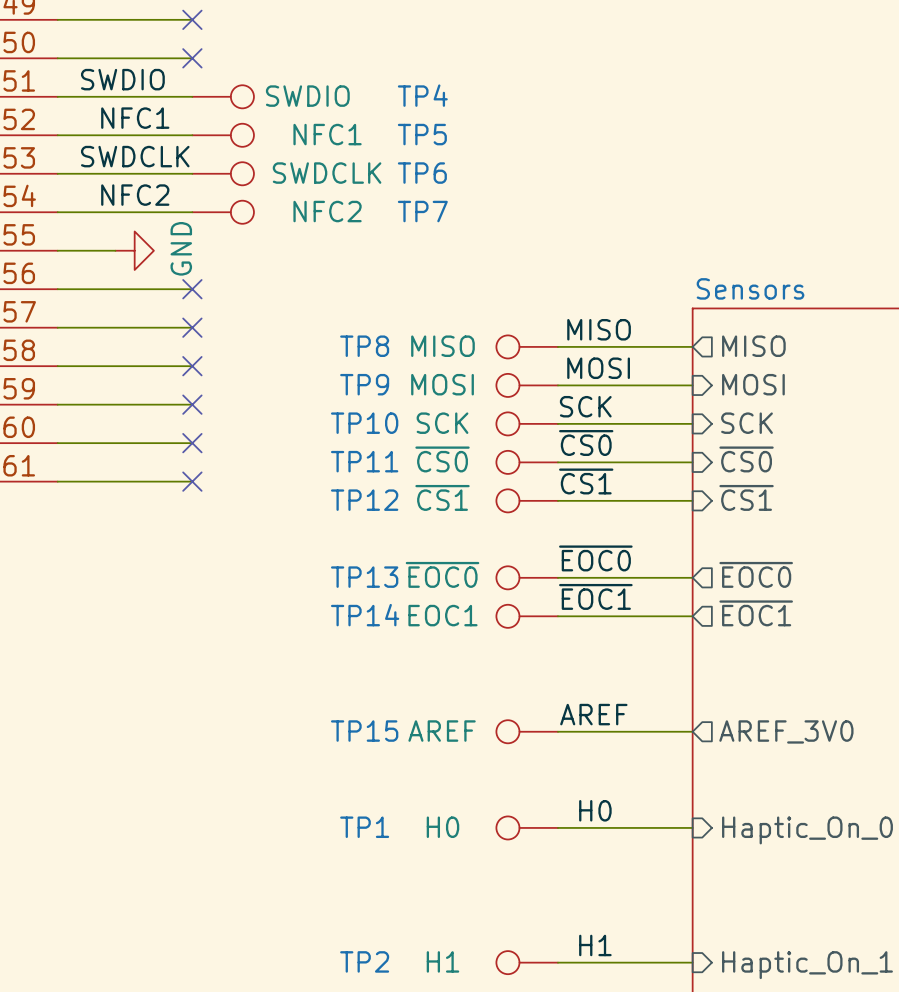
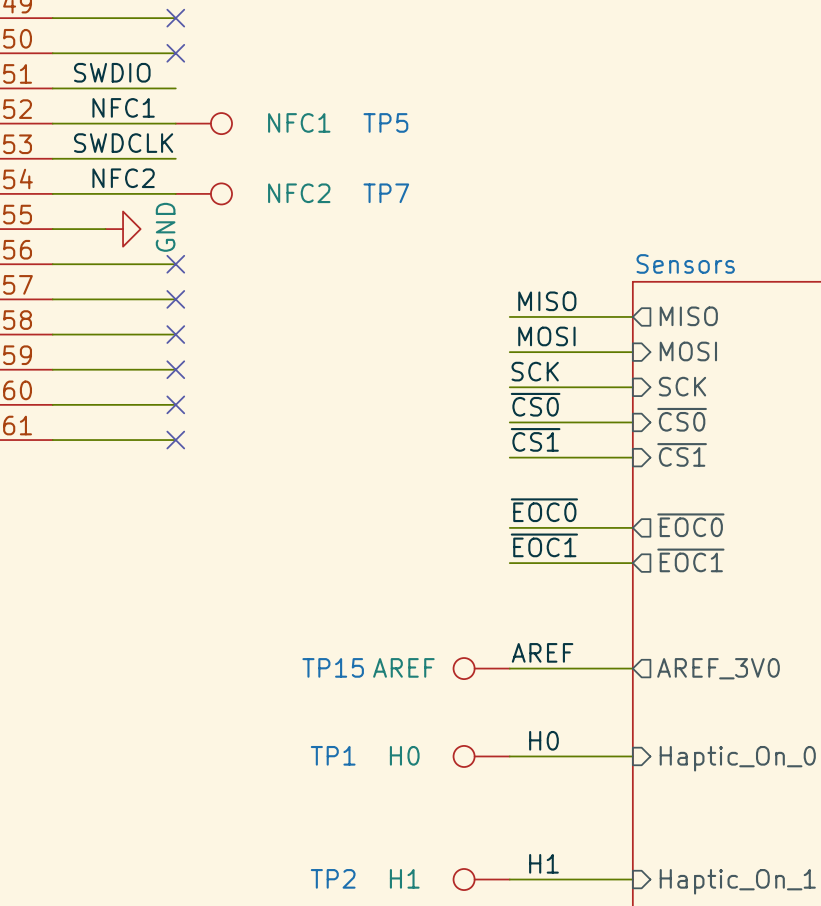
TP4: SWDIO (223, 96) -> none
TP6: SWDCLK (223, 173) -> none
TP8: MISO (527, 346) -> none
TP9: MOSI (527, 385) -> none
TP10: SCK (527, 423) -> none
TP11: ~{CS0} (527, 462) -> none
TP12: ~{CS1} (527, 500) -> none
TP13: ~{EOC0} (527, 577) -> none
TP14: EOC1 (527, 616) -> none

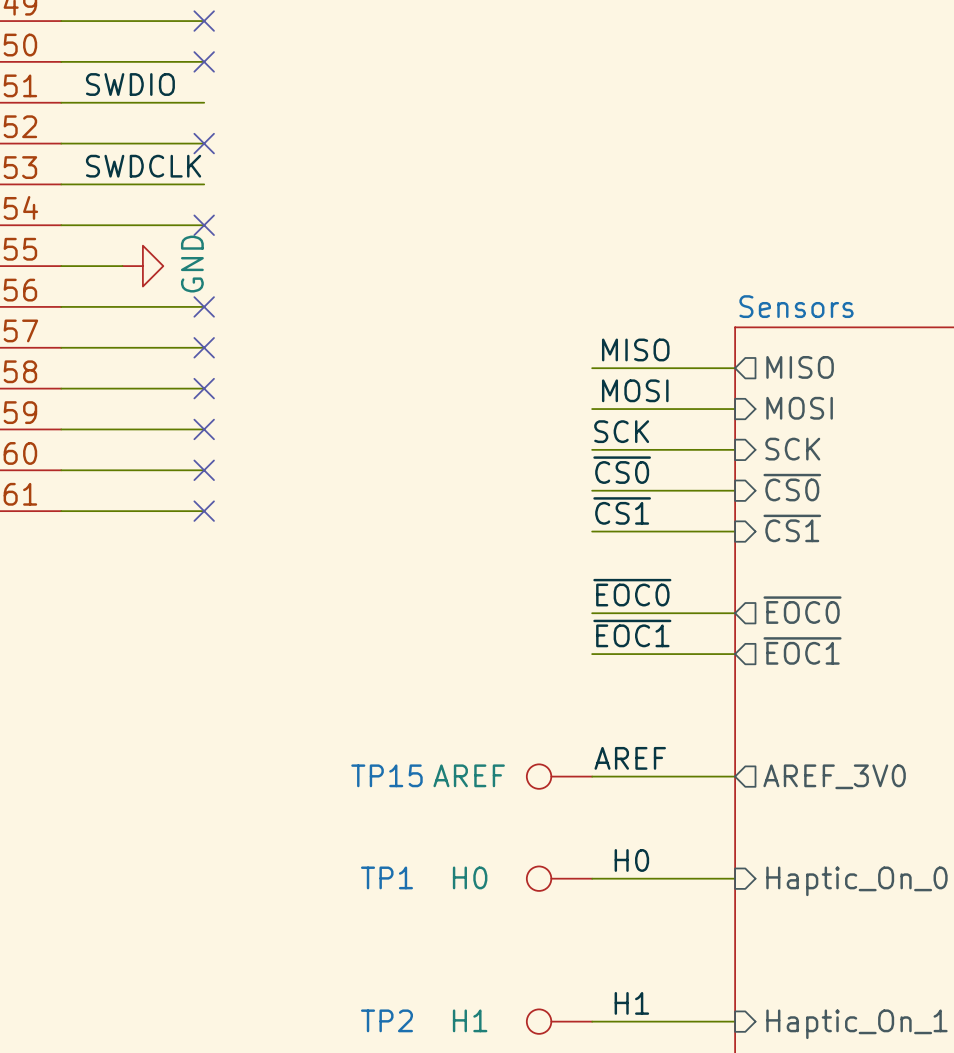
label: NFC1 (123, 107) -> none
no-connect mark: none -> (204, 143)
TP5: NFC1 (203, 123) -> none
label: NFC2 (123, 178) -> none
no-connect mark: none -> (204, 225)
TP7: NFC2 (203, 193) -> none

